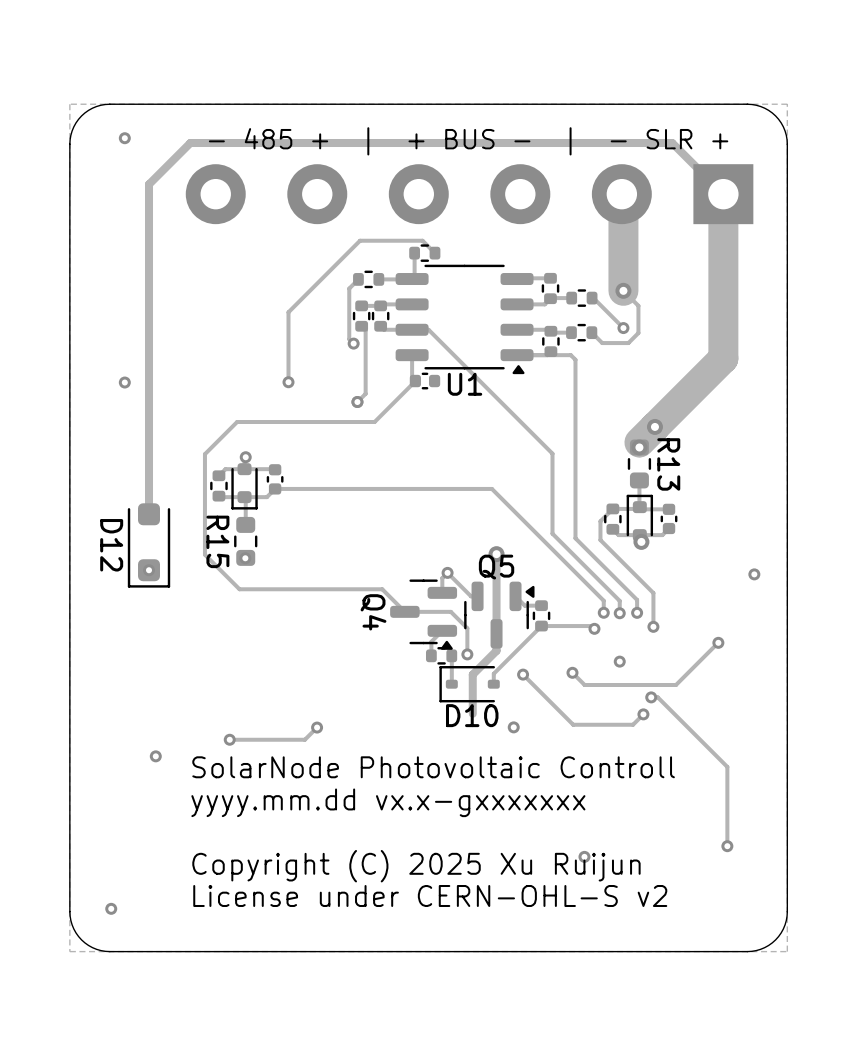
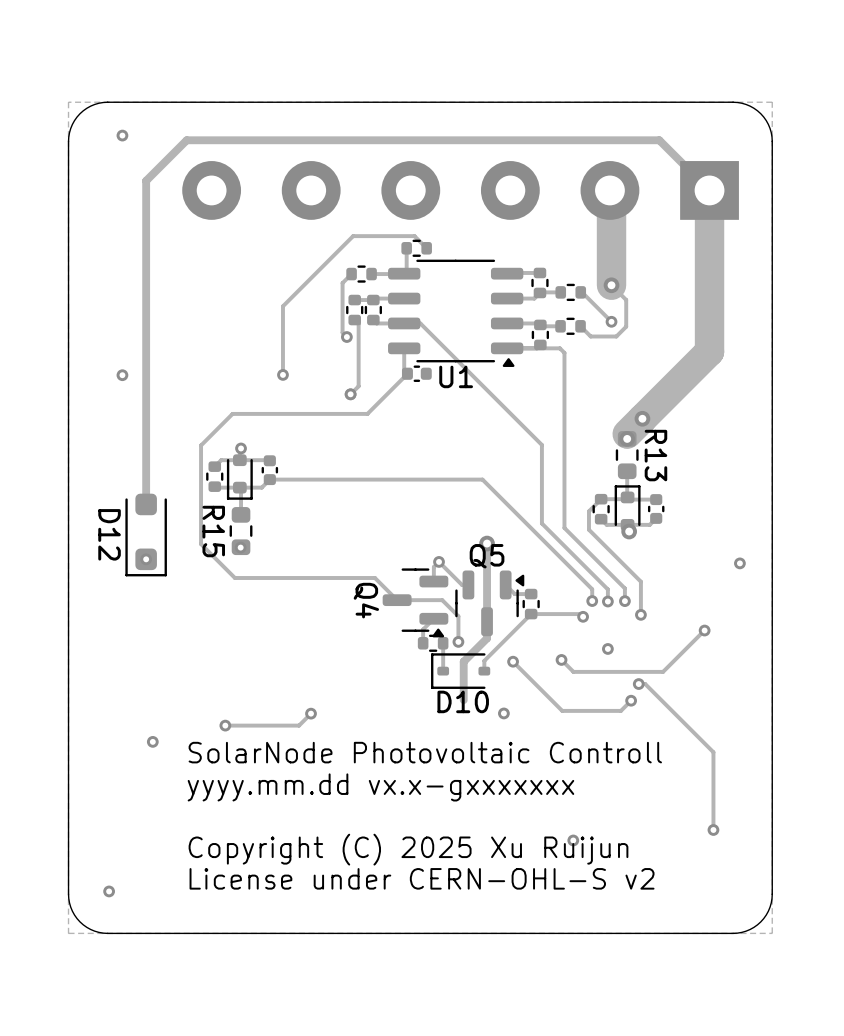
text: - 485 + | + BUS - | - SLR + (468, 141) -> none

